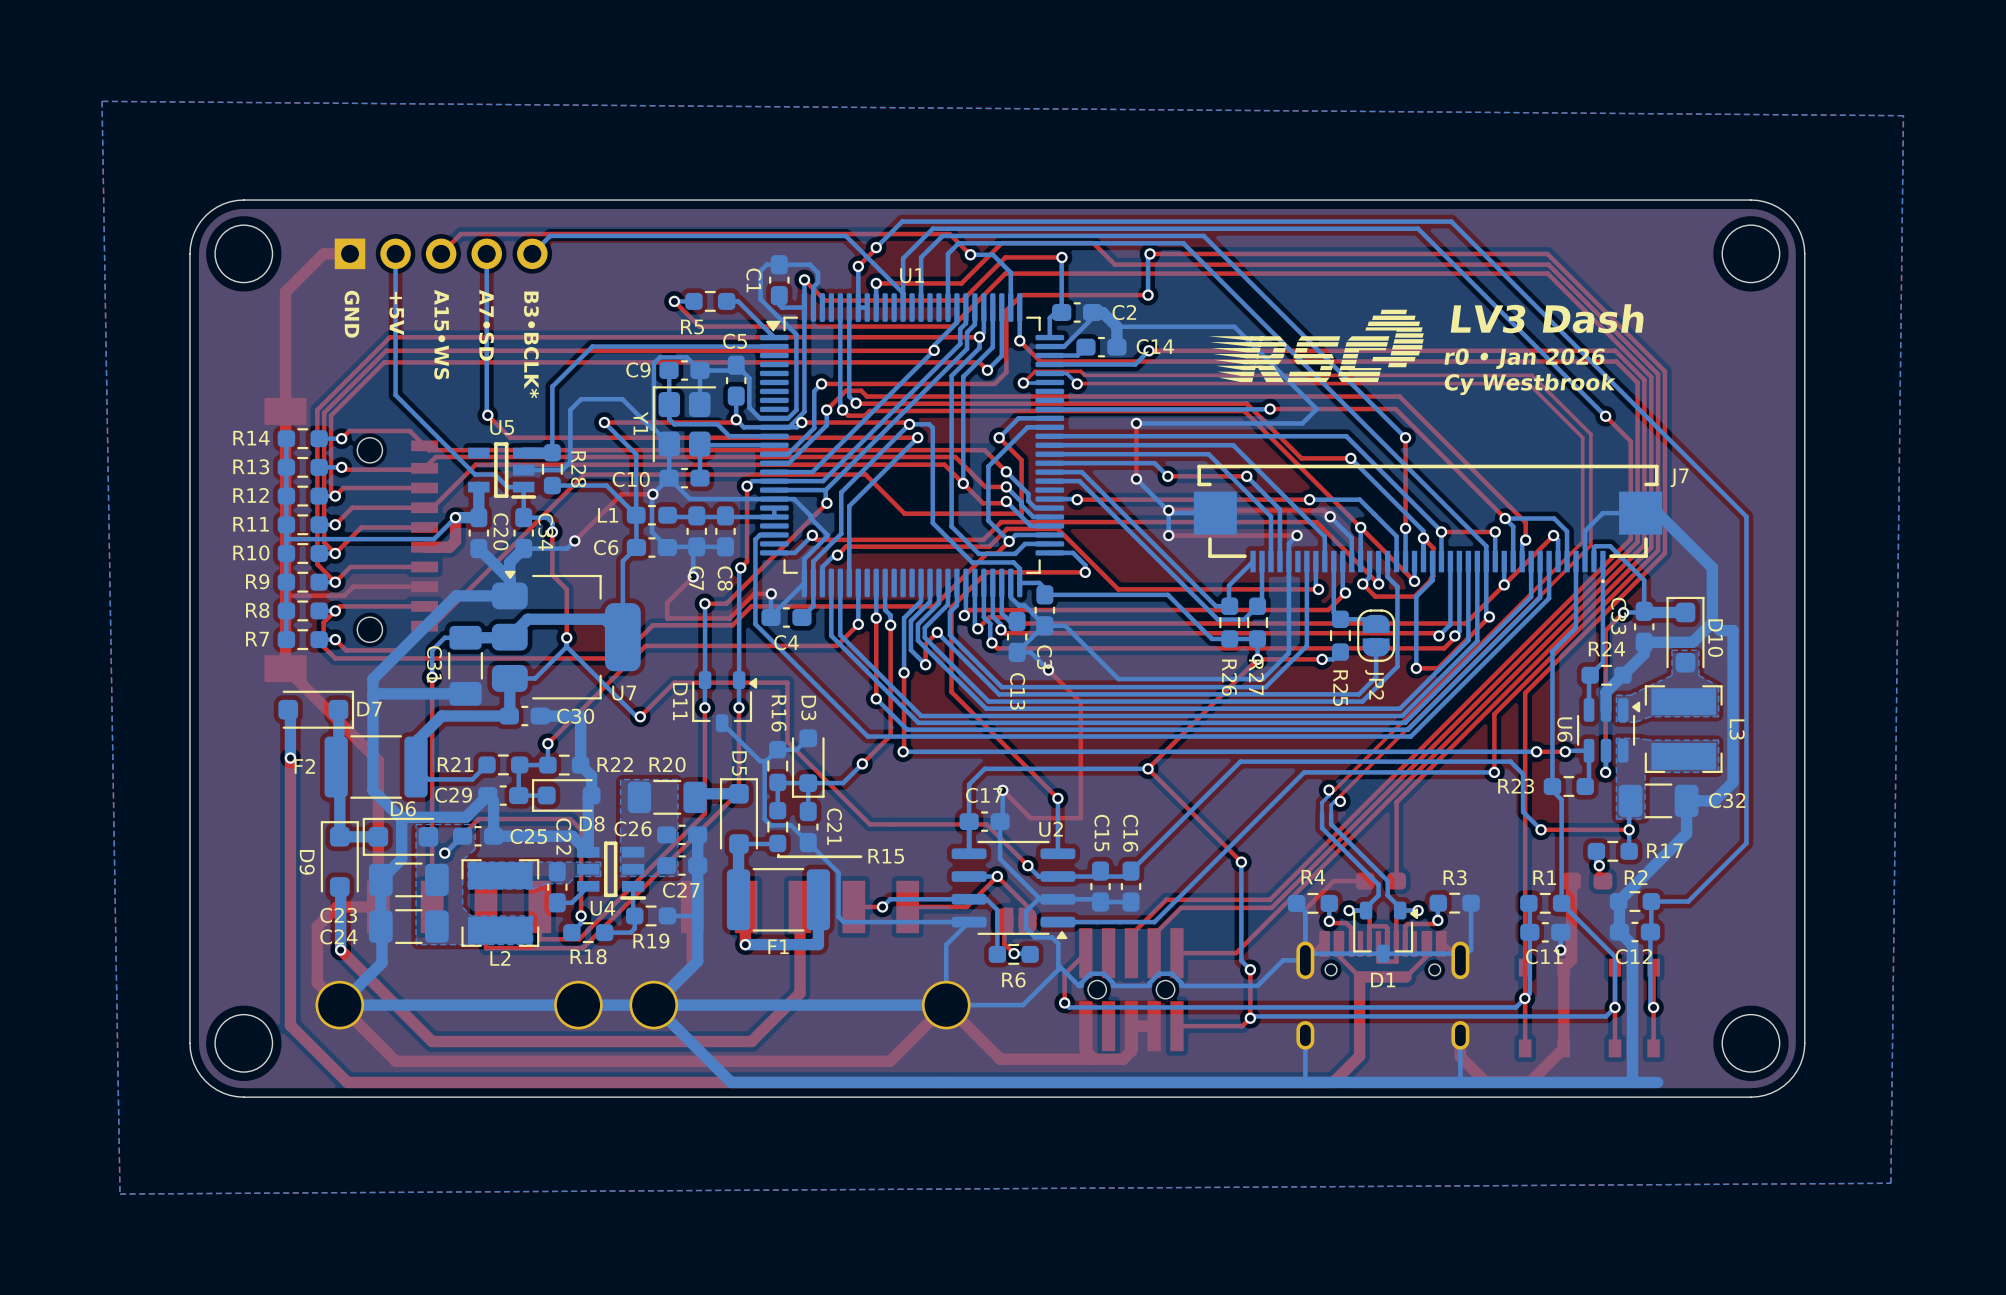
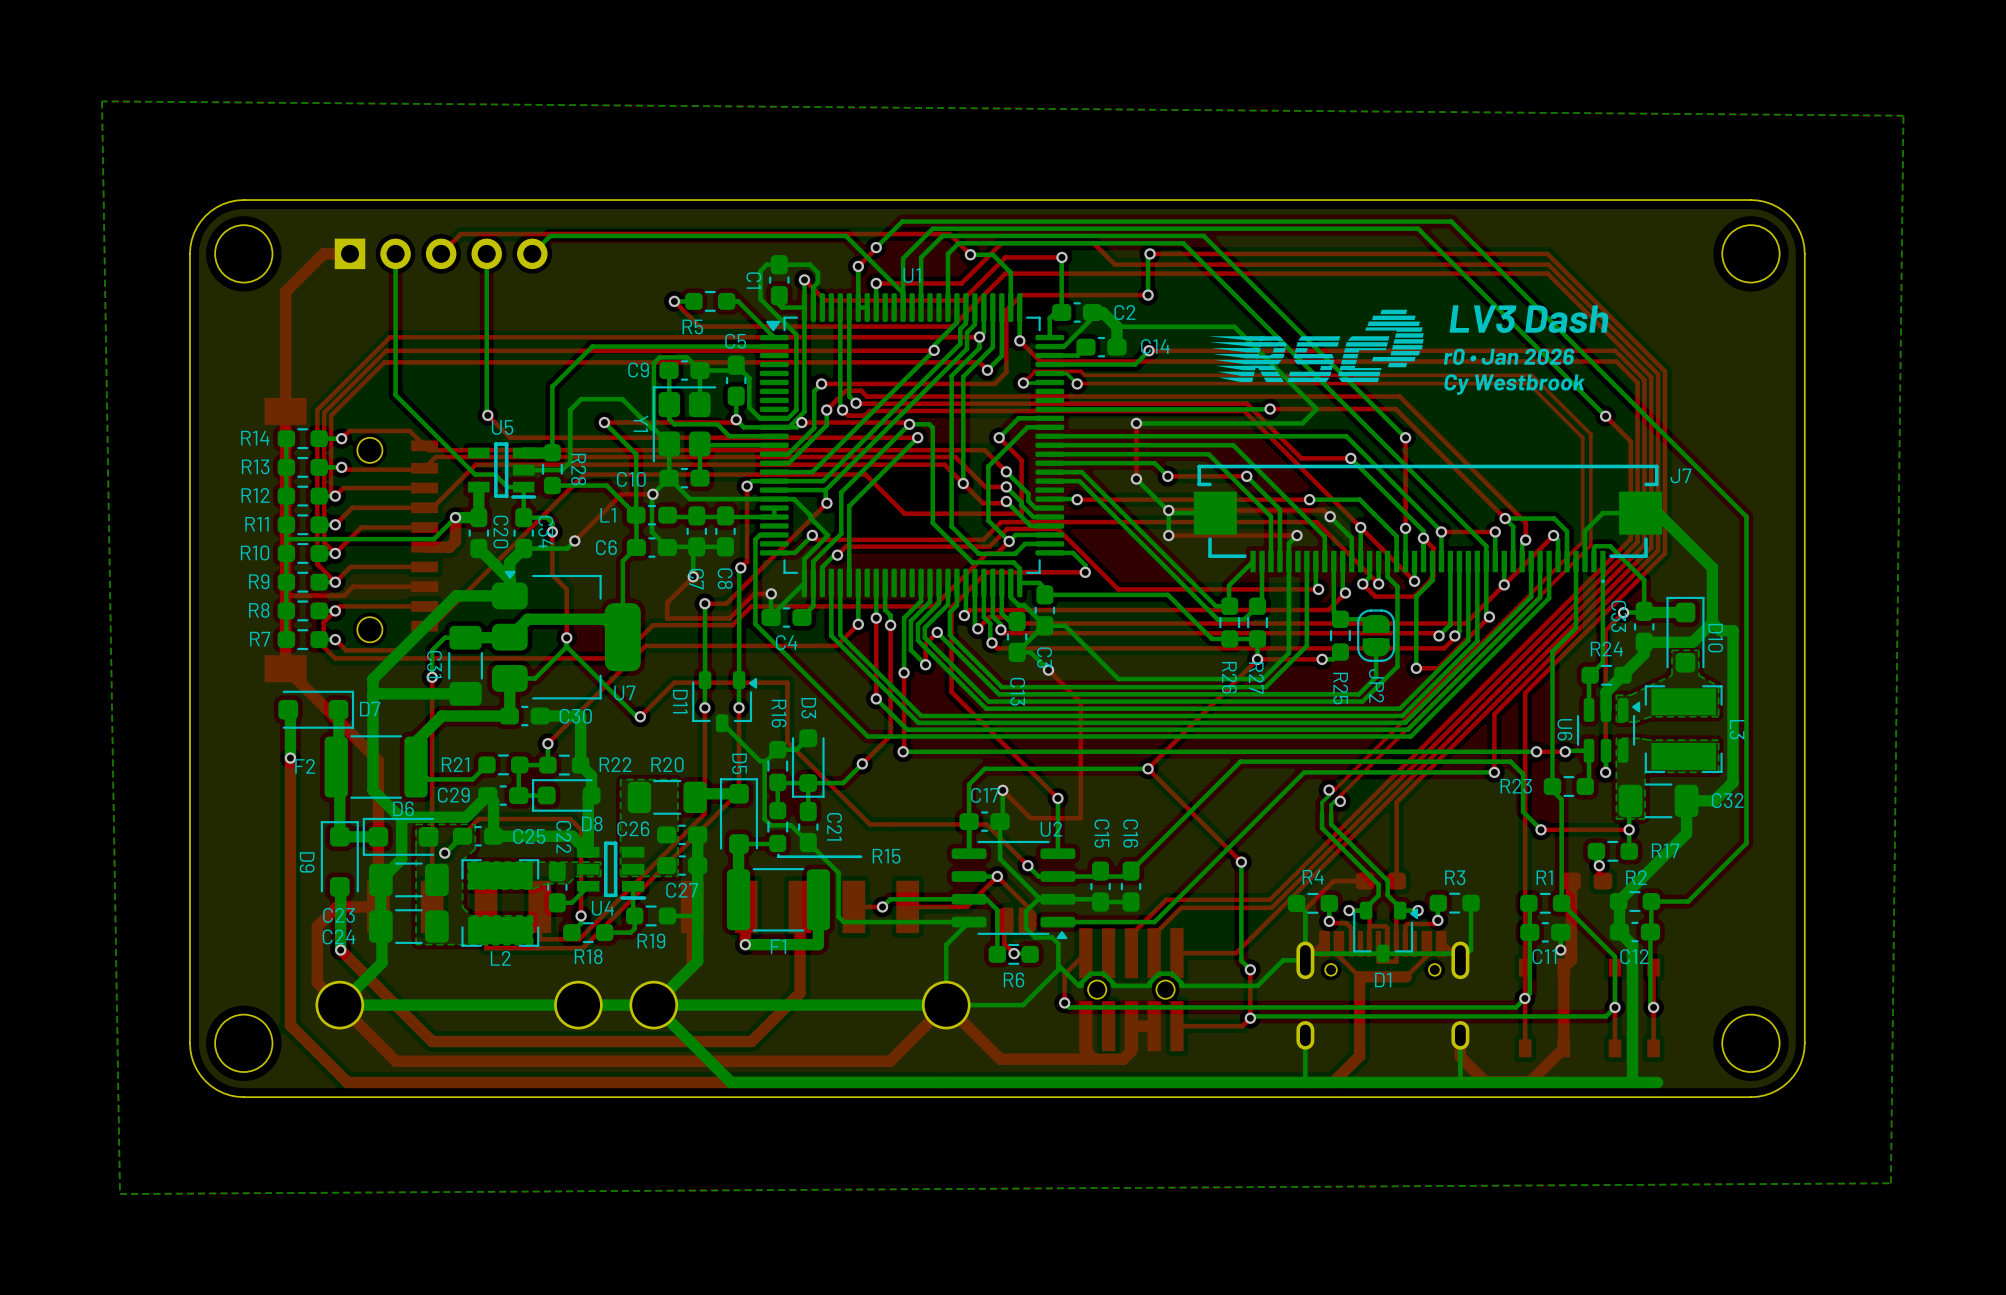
text: +5V (396, 313) -> none
text: GND (351, 314) -> none
text: A7•SD (486, 325) -> none
text: A15•WS (441, 334) -> none
text: B3•BCLK* (531, 344) -> none

